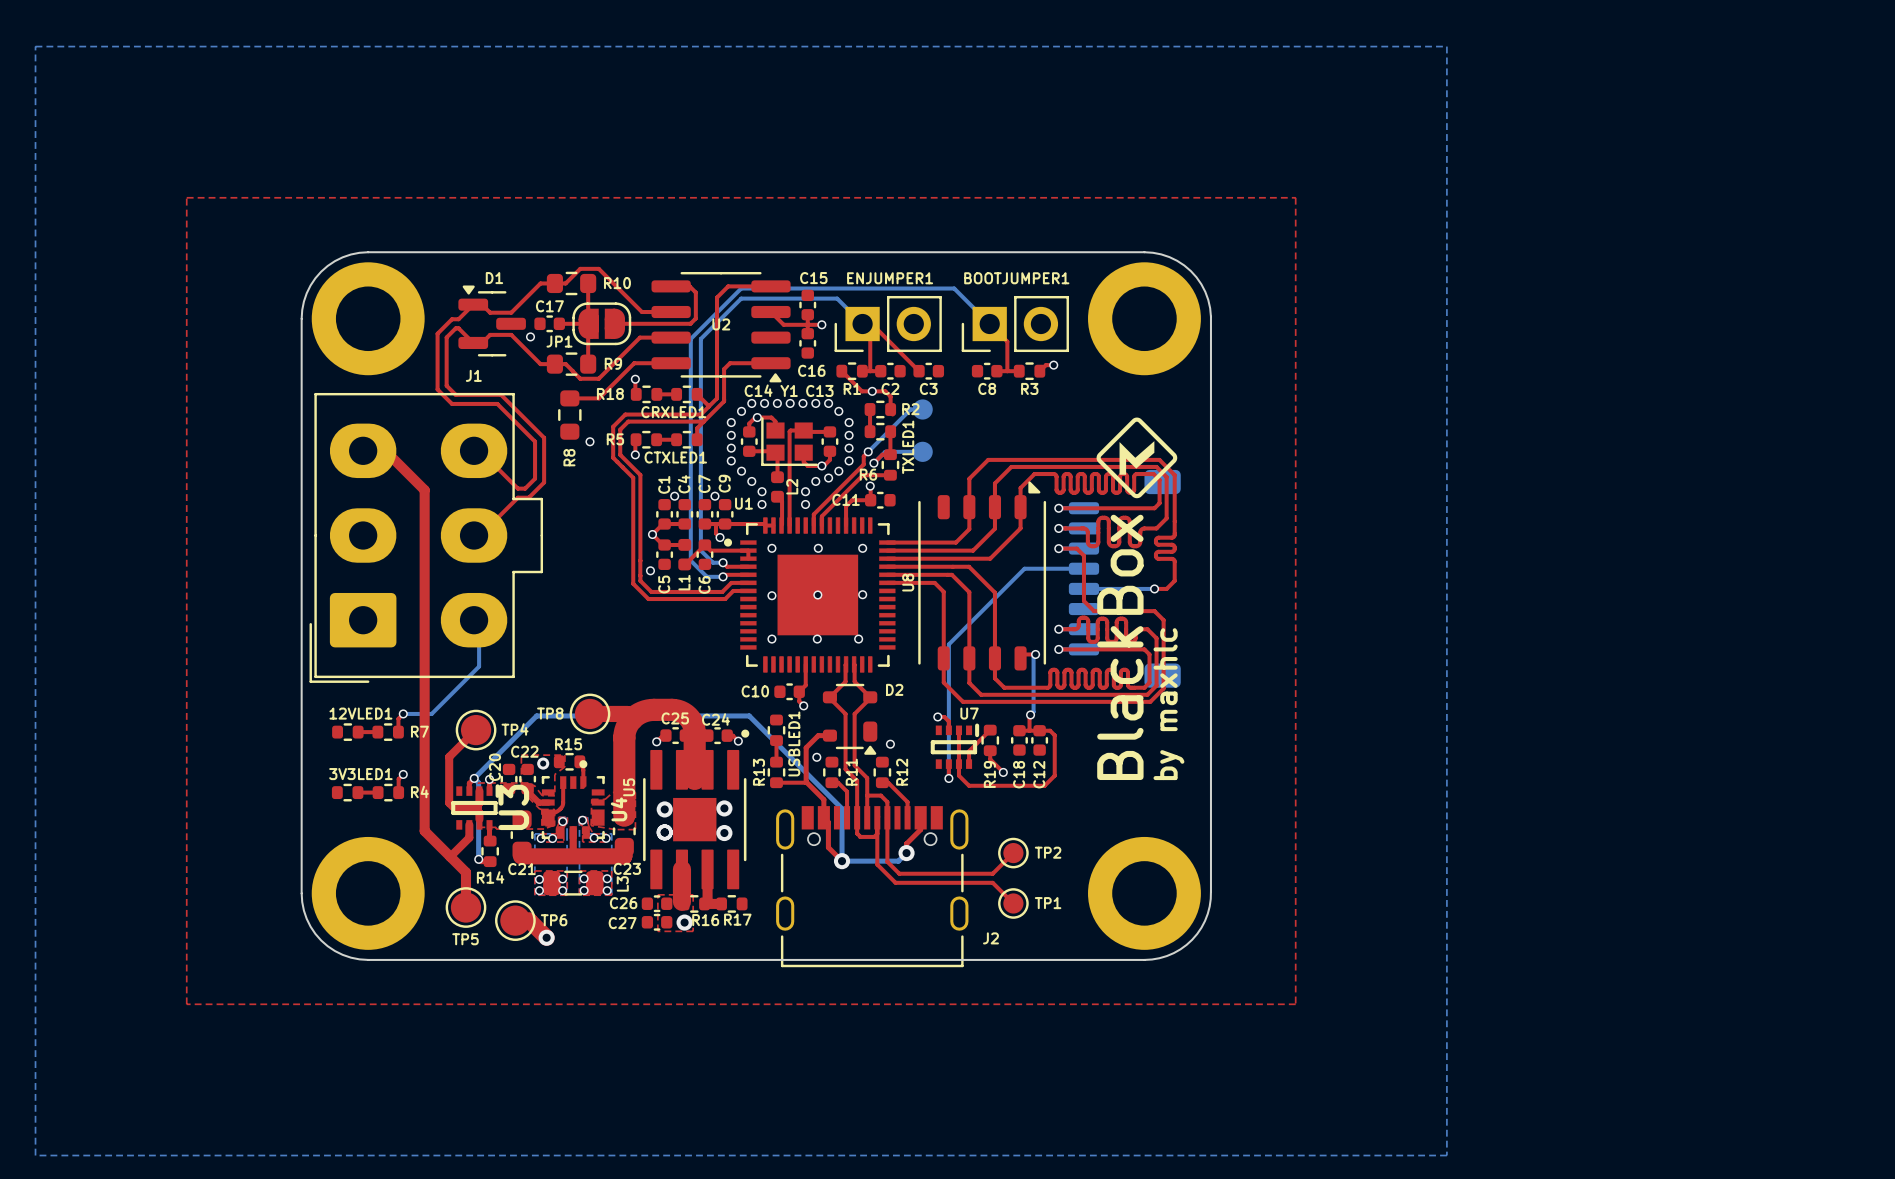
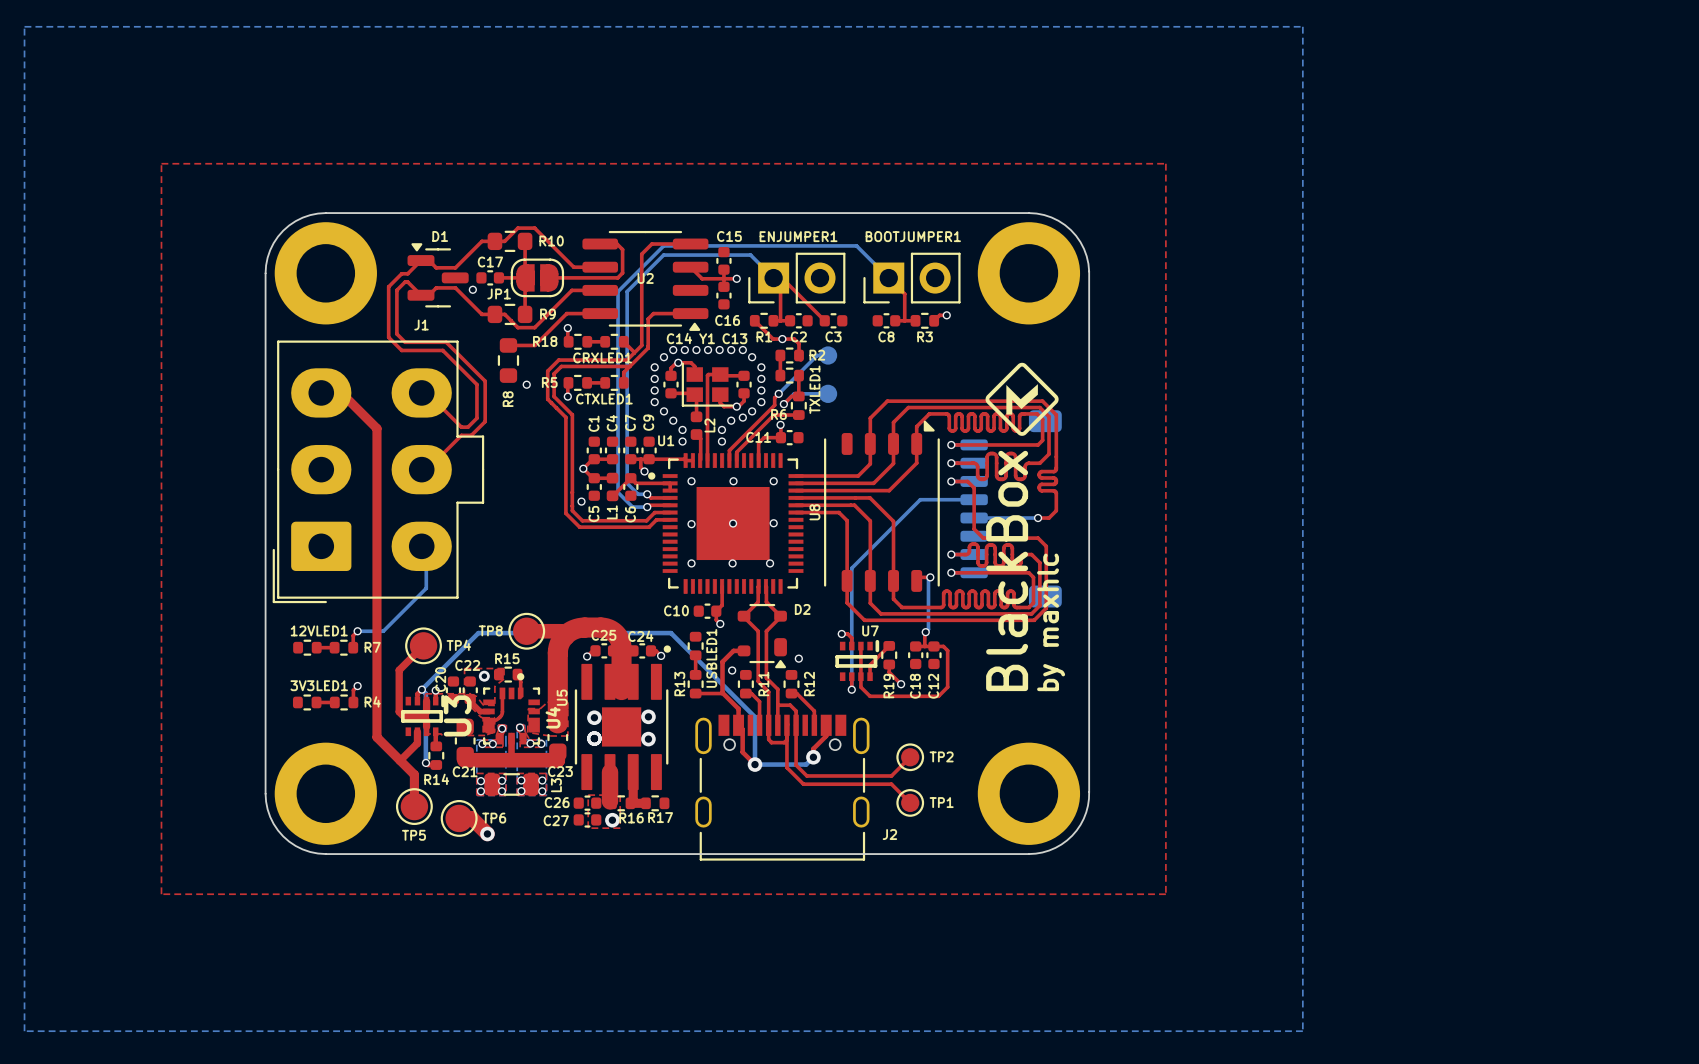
via: (674, 496) -> none
via: (715, 496) -> none

